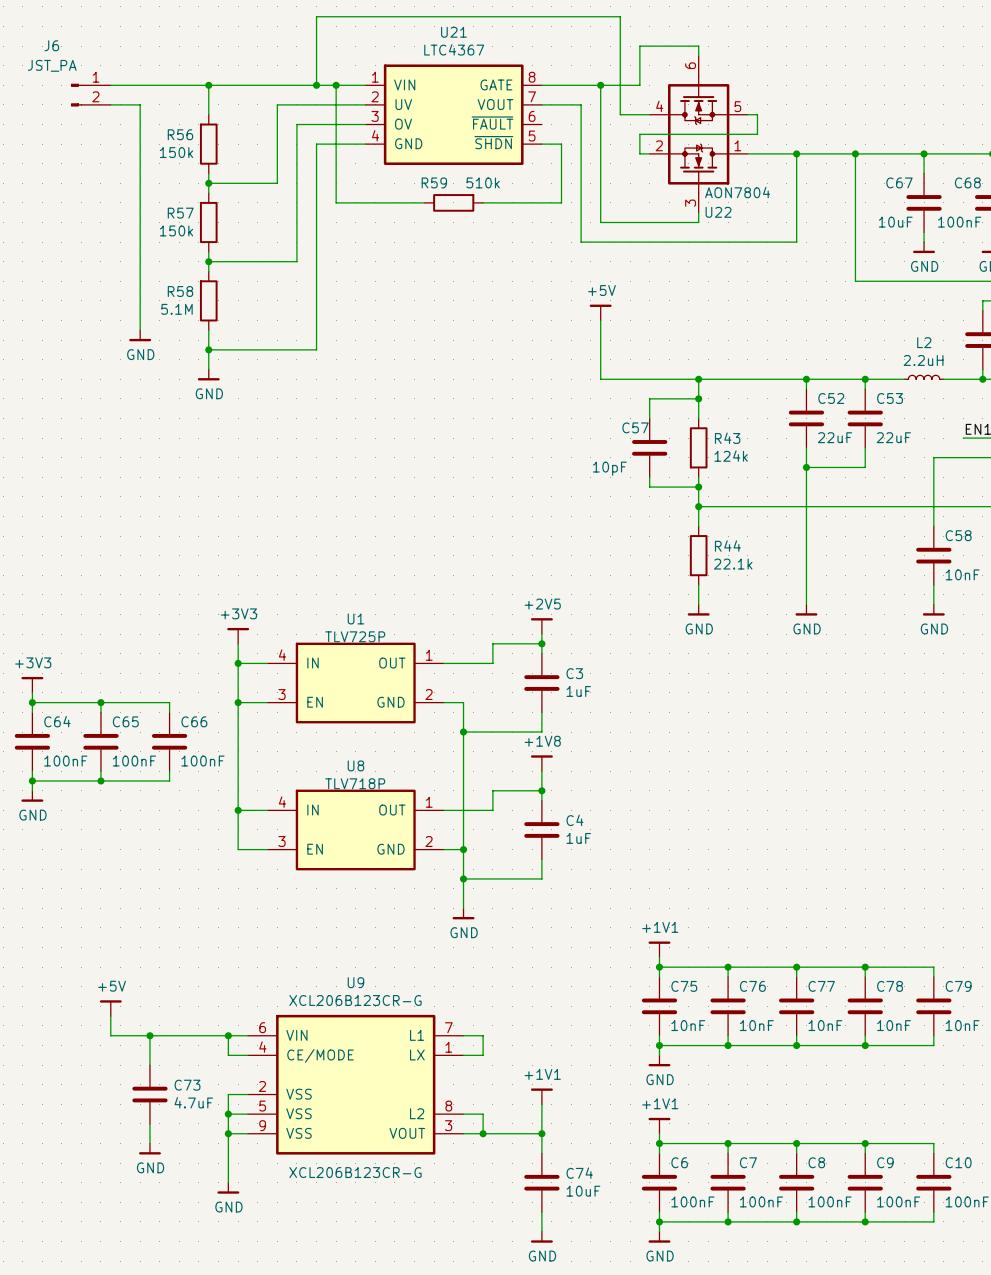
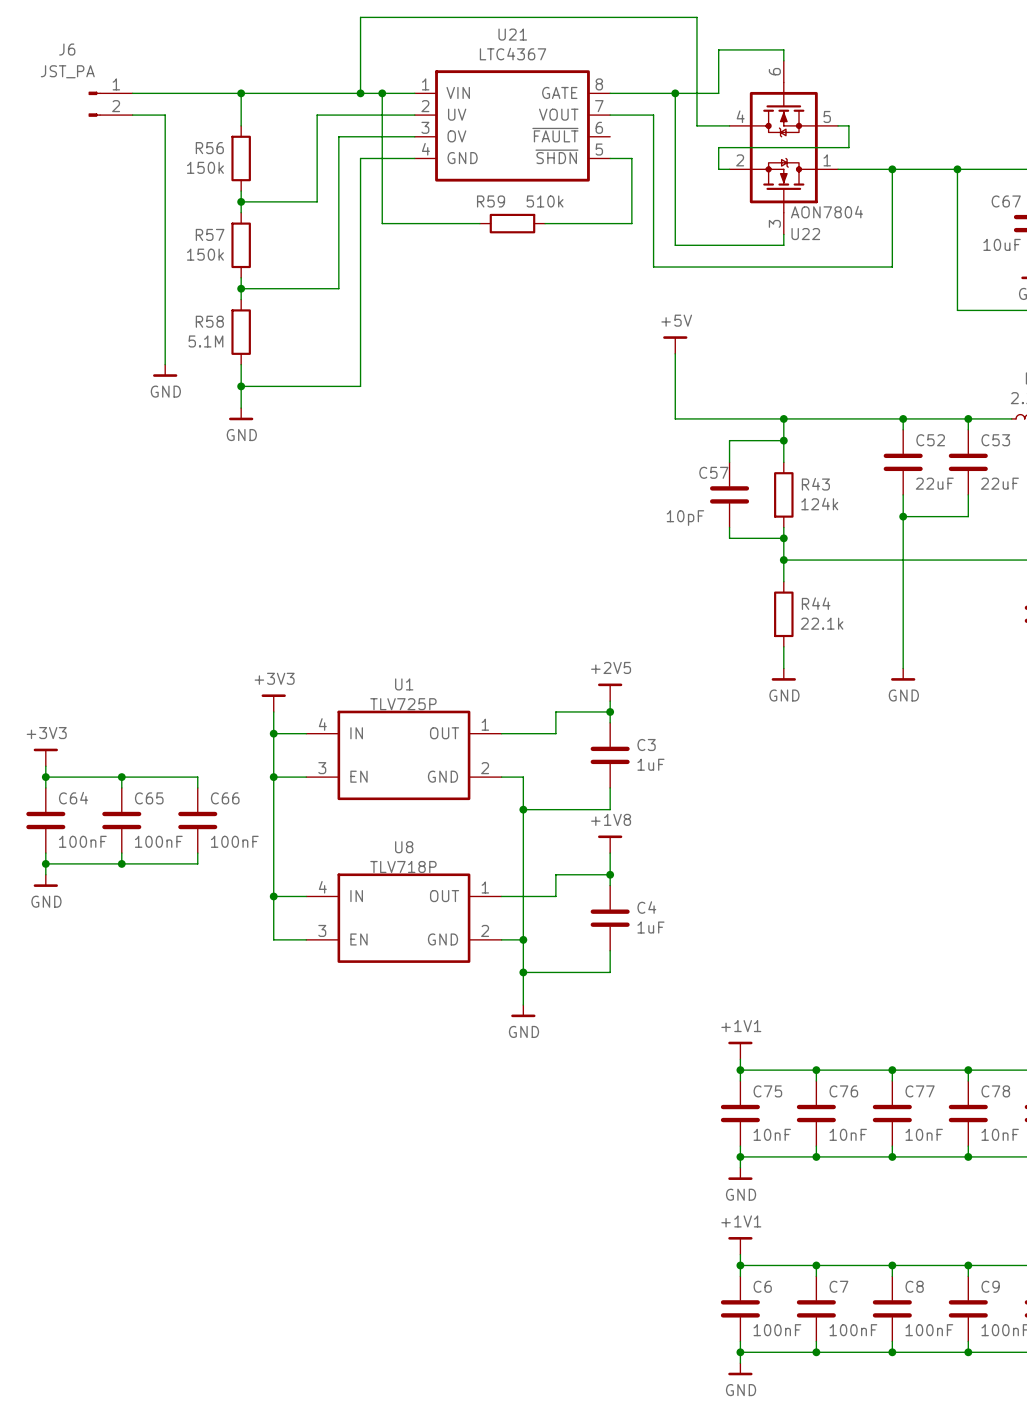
power symbol: +5V (110, 1008) -> none
wire: (110, 1016) (110, 1035) (247, 1035) -> none
wire: (149, 1035) (149, 1065) -> none
junction: (149, 1035) -> none
wire: (228, 1035) (228, 1055) (247, 1055) -> none
junction: (228, 1035) -> none
wire: (463, 1035) (483, 1035) (483, 1055) (463, 1055) -> none
U9: XCL206B123CR-G (355, 1084) -> none
C73: 4.7uF (149, 1094) -> none
wire: (247, 1094) (228, 1094) (228, 1182) -> none
power symbol: +1V1 (541, 1096) -> none
wire: (541, 1104) (541, 1153) -> none
wire: (228, 1114) (247, 1114) -> none
junction: (228, 1114) -> none
wire: (463, 1114) (483, 1114) (483, 1133) -> none
wire: (149, 1123) (149, 1143) -> none
wire: (228, 1133) (247, 1133) -> none
junction: (228, 1133) -> none
wire: (463, 1133) (541, 1133) -> none
junction: (483, 1133) -> none
junction: (541, 1133) -> none
power symbol: GND (149, 1149) -> none
C74: 10uF (541, 1182) -> none
power symbol: GND (228, 1188) -> none
wire: (541, 1212) (541, 1231) -> none
power symbol: GND (541, 1237) -> none

